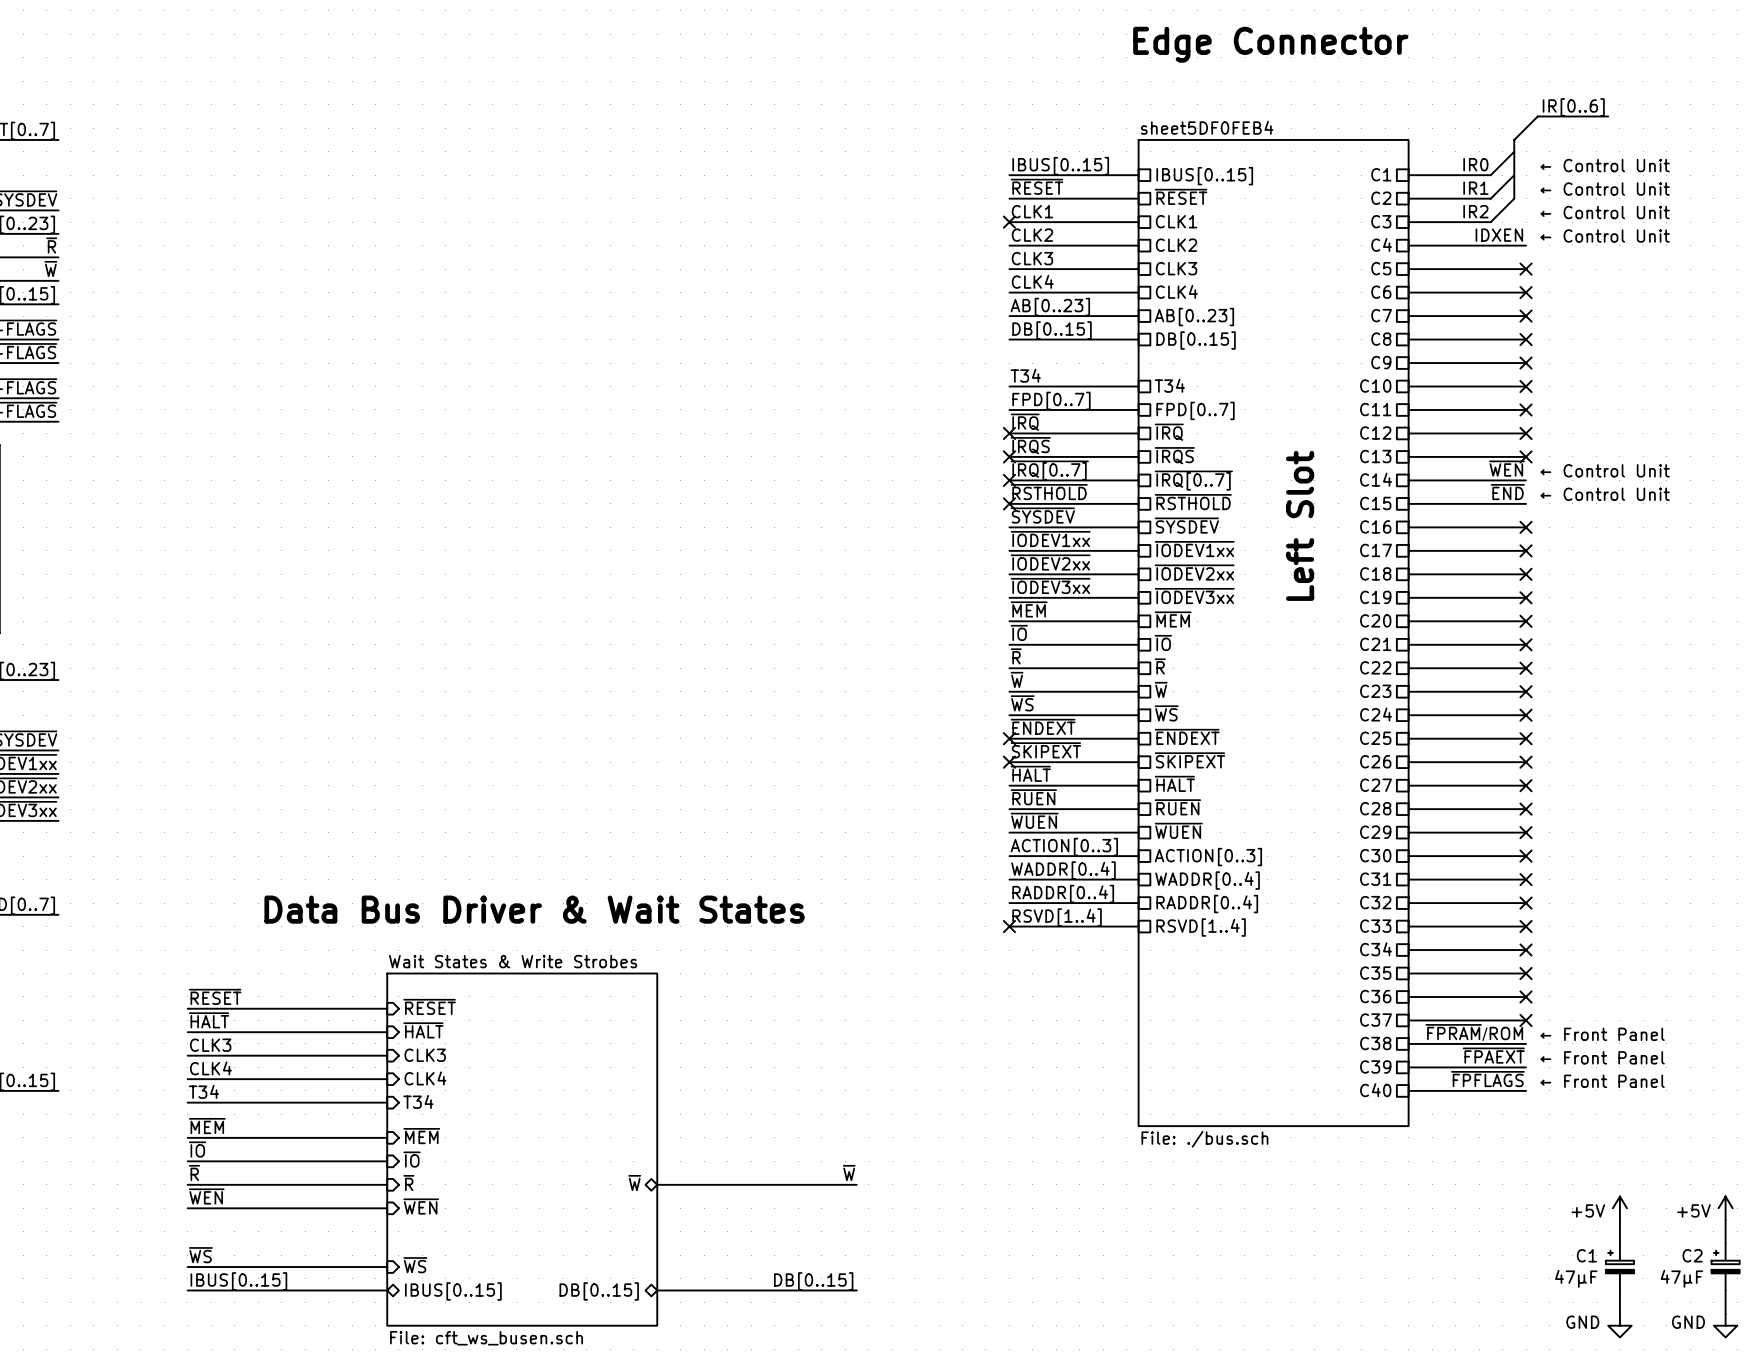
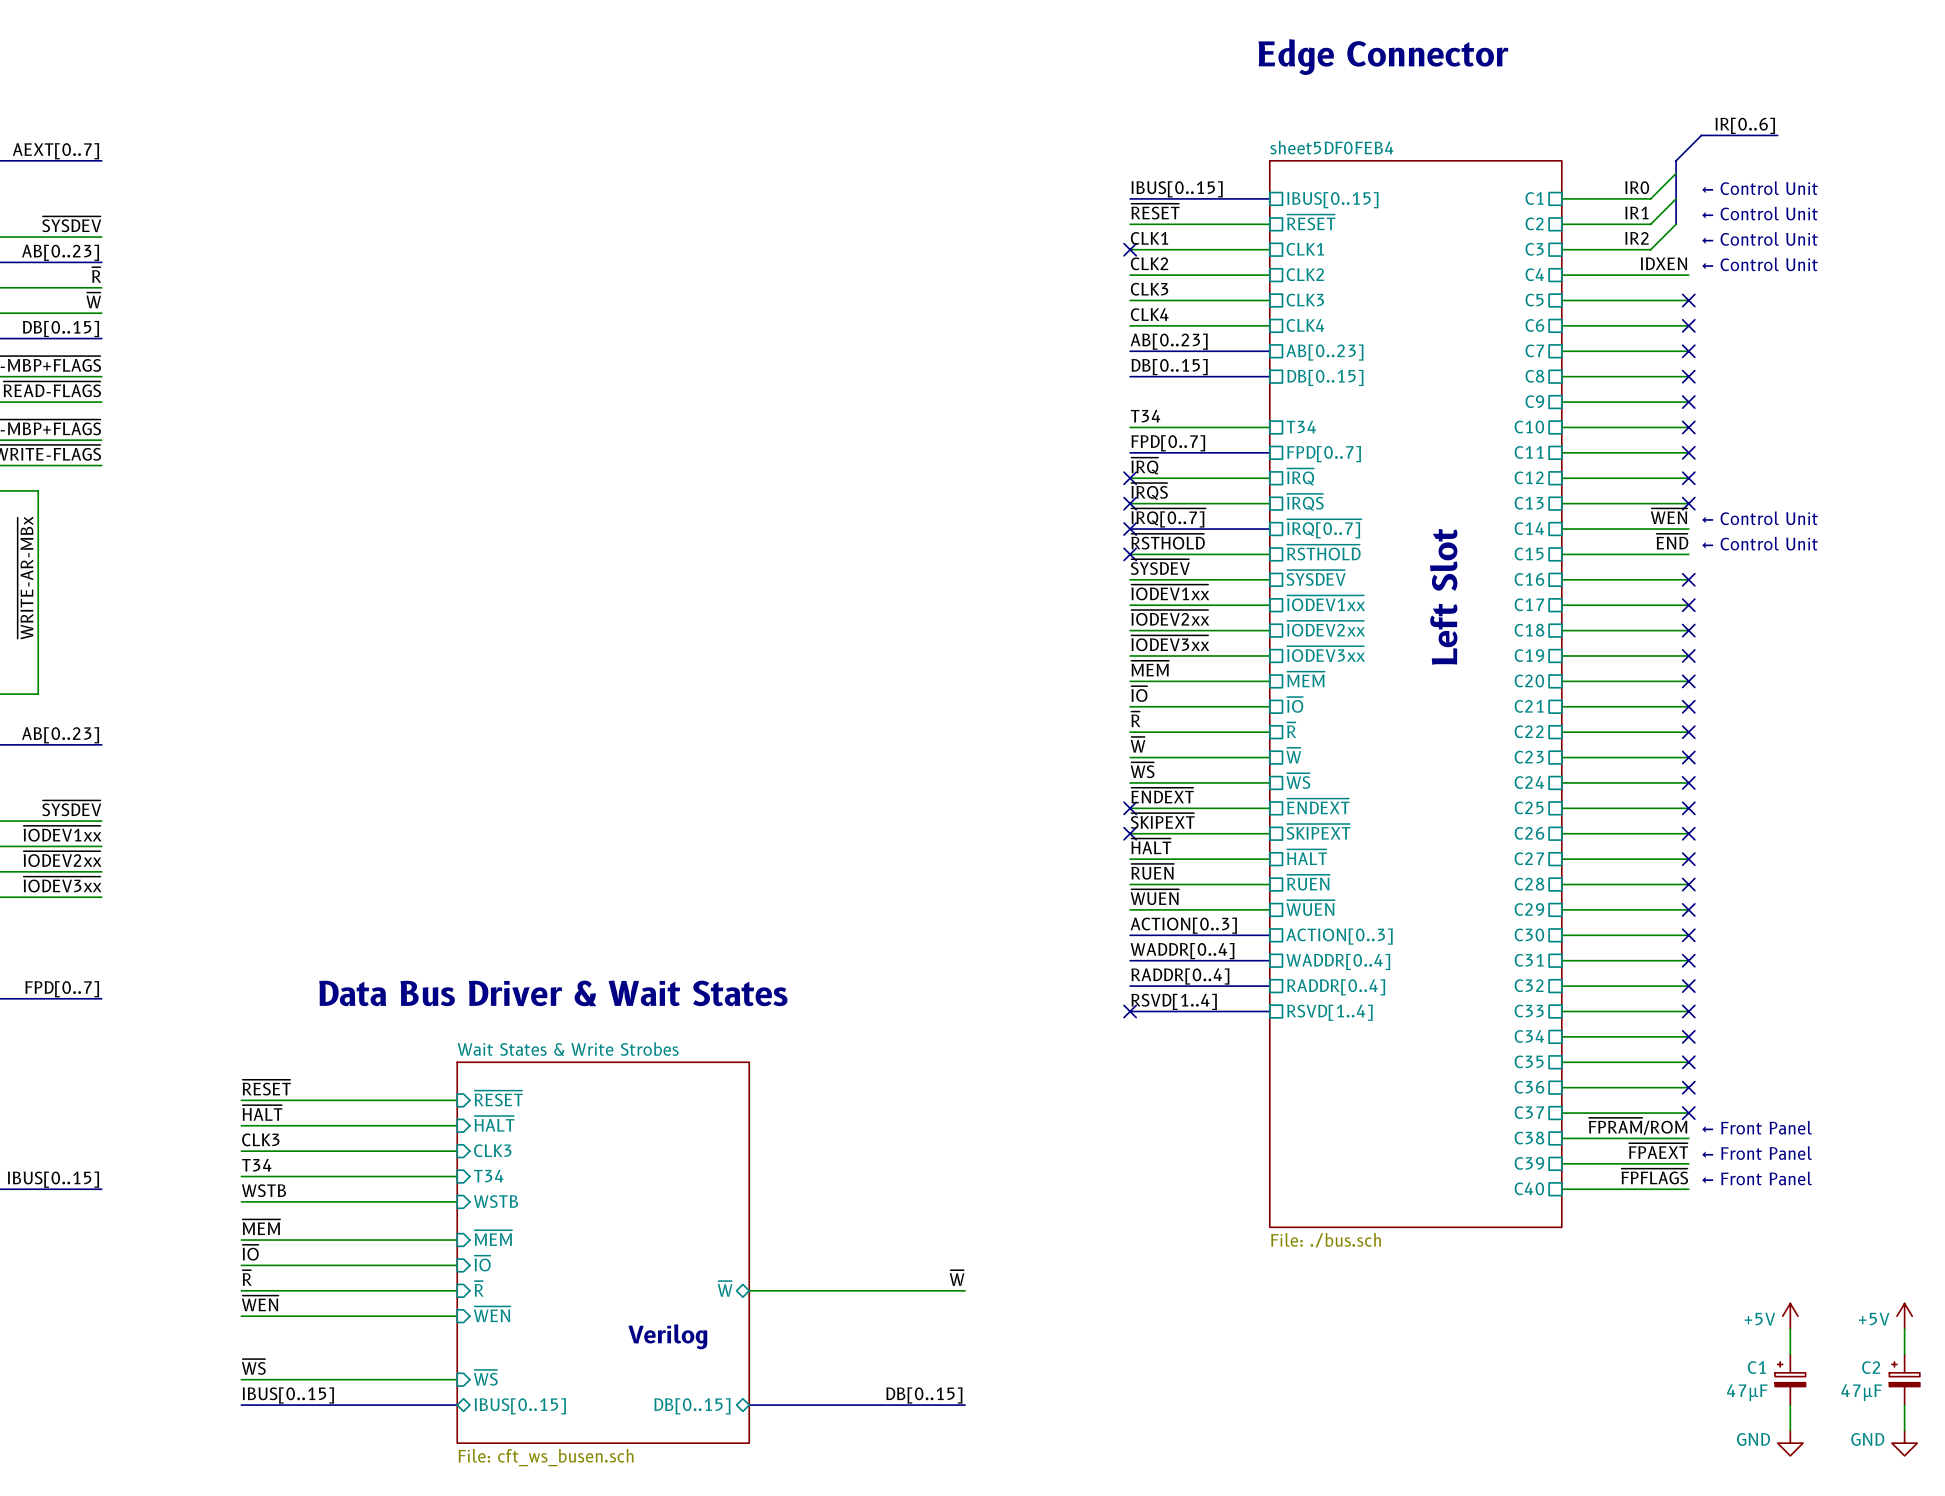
label: CLK4 (210, 1068) -> T34 (256, 1165)
sheet pin: CLK4 (425, 1078) -> T34 (488, 1176)
label: T34 (203, 1091) -> WSTB (263, 1190)
sheet pin: T34 (418, 1101) -> WSTB (495, 1201)
text: none -> Verilog (667, 1336)

